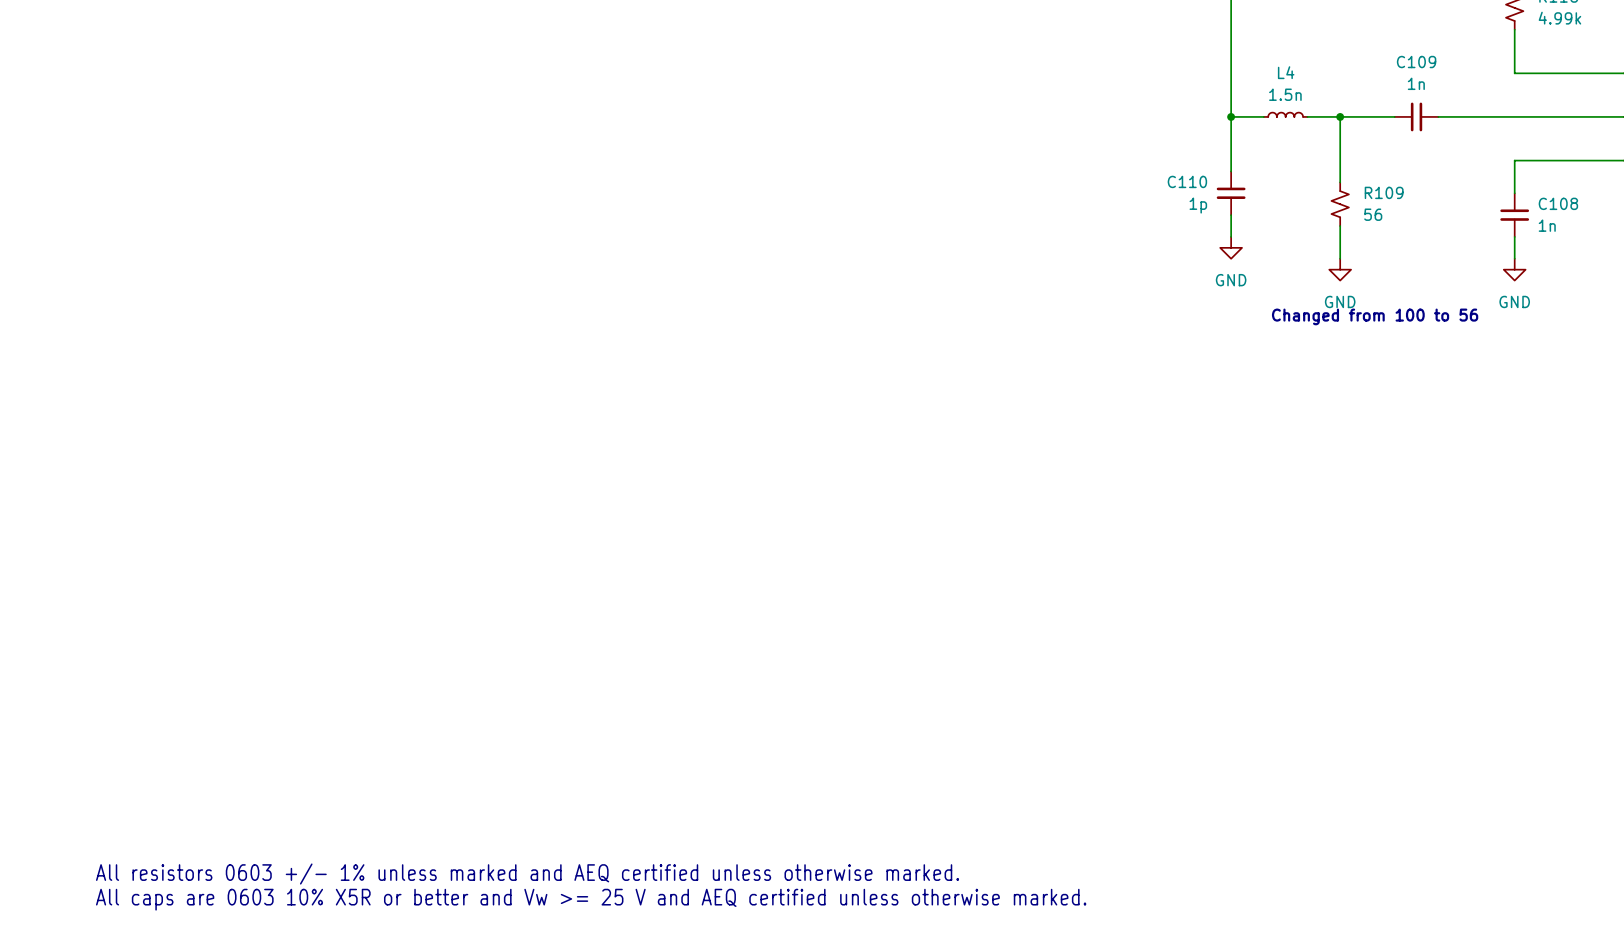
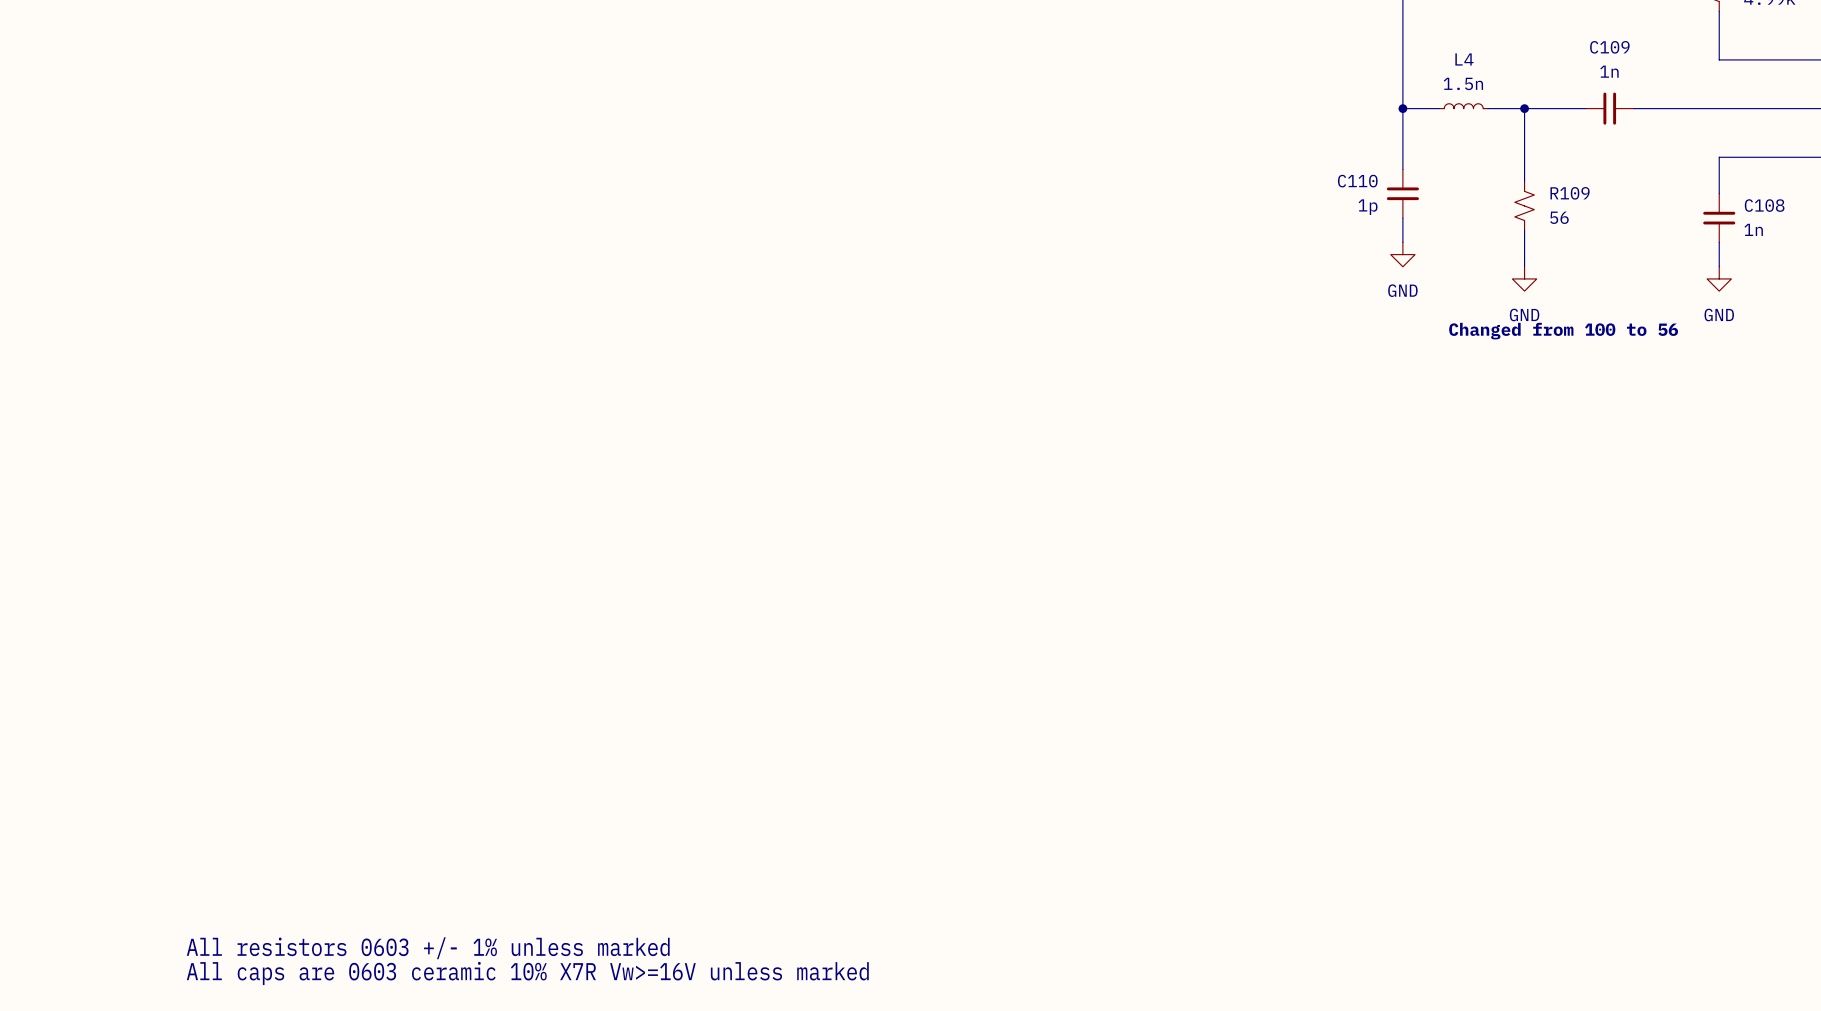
text: All resistors 0603 +/- 1% unless marked and AEQ certified unless otherwise marked. (527, 874) -> All resistors 0603 +/- 1% unless marked (428, 948)
text: none -> All caps are 0603 ceramic 10% X7R Vw>=16V unless marked (527, 973)
text: All caps are 0603 10% X5R or better and Vw >= 25 V and AEQ certified unless otherwise marked. (591, 899) -> none

